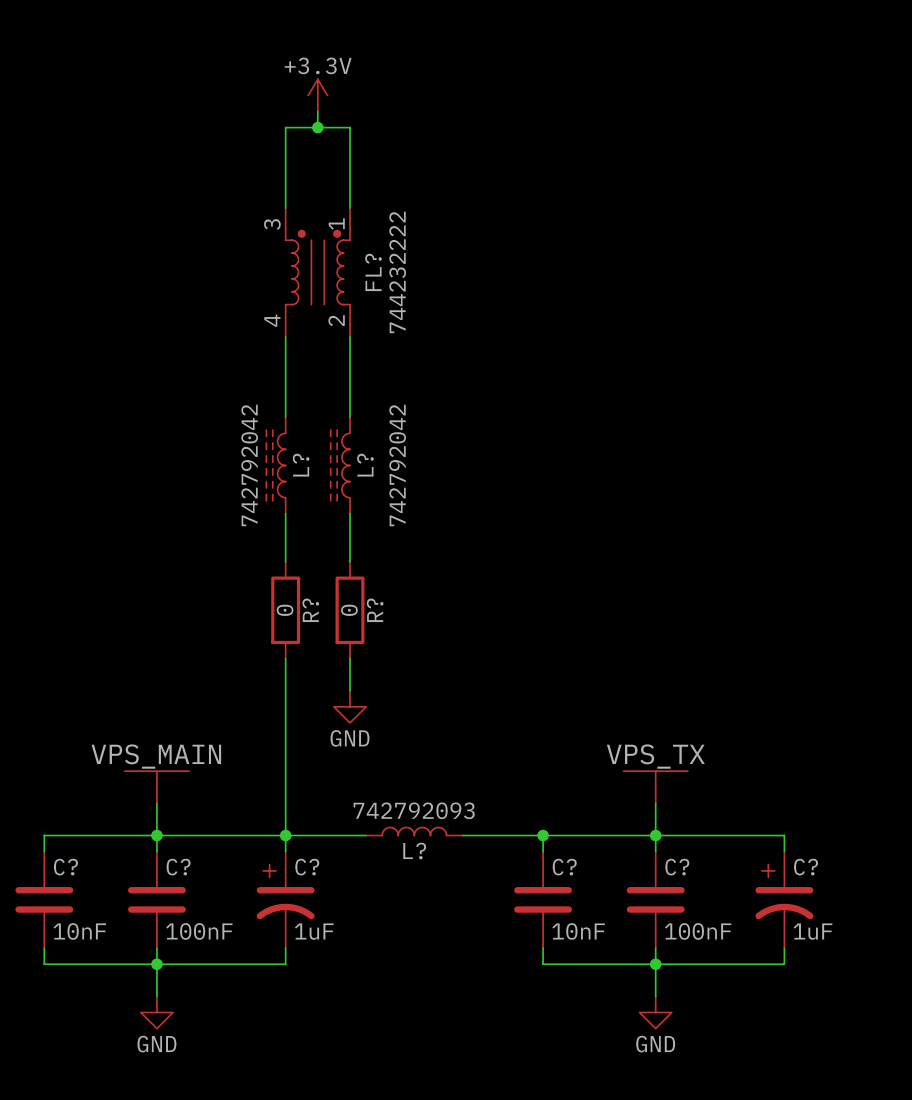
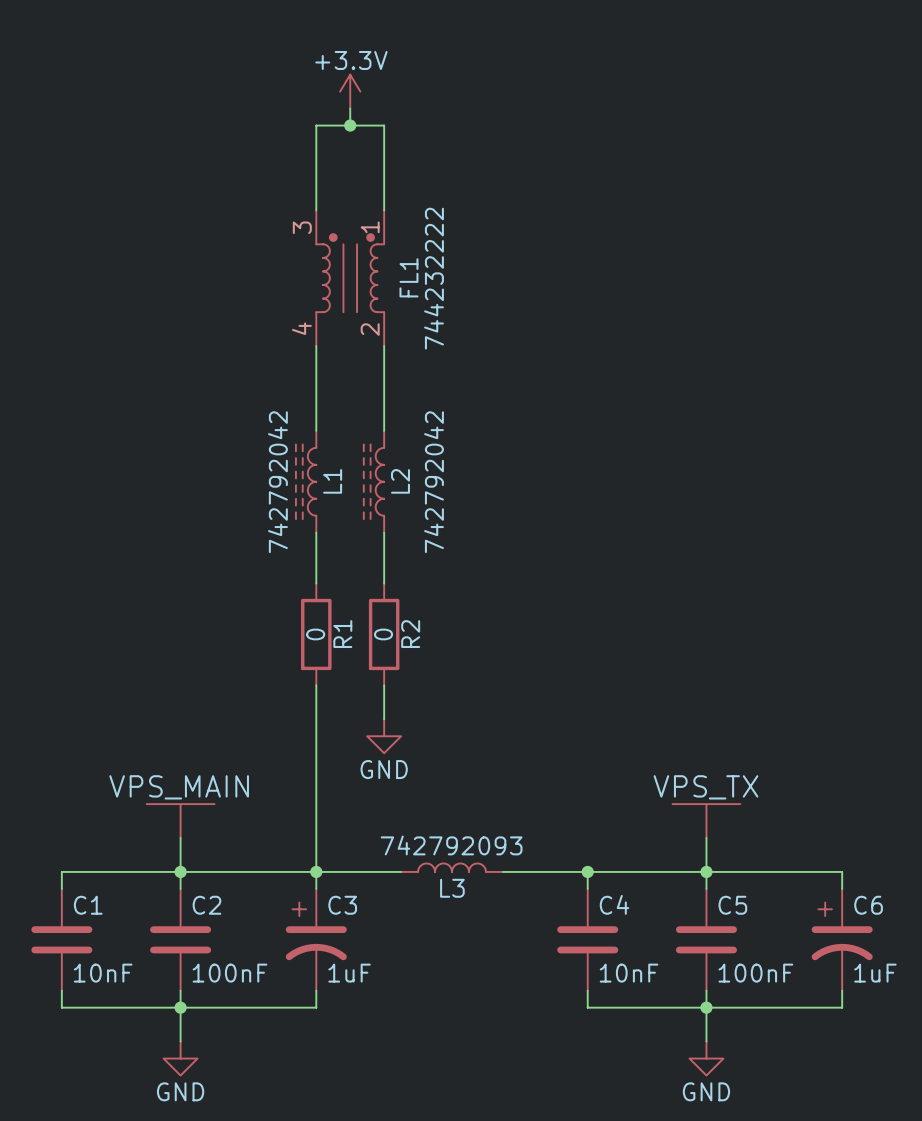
FL? name: FL? (373, 272) -> FL1 (408, 277)
L? name: L? (301, 465) -> L1 (332, 481)
L? name: L? (365, 465) -> L2 (400, 481)
R? name: R? (310, 610) -> R1 (342, 634)
R? name: R? (375, 610) -> R2 (410, 634)
L? name: L? (414, 850) -> L3 (452, 888)
C? name: C? (65, 867) -> C1 (88, 905)
C? name: C? (178, 867) -> C2 (206, 905)
C? name: C? (307, 867) -> C3 (342, 905)
C? name: C? (564, 867) -> C4 (614, 904)
C? name: C? (677, 867) -> C5 (732, 905)
C? name: C? (806, 867) -> C6 (868, 905)

